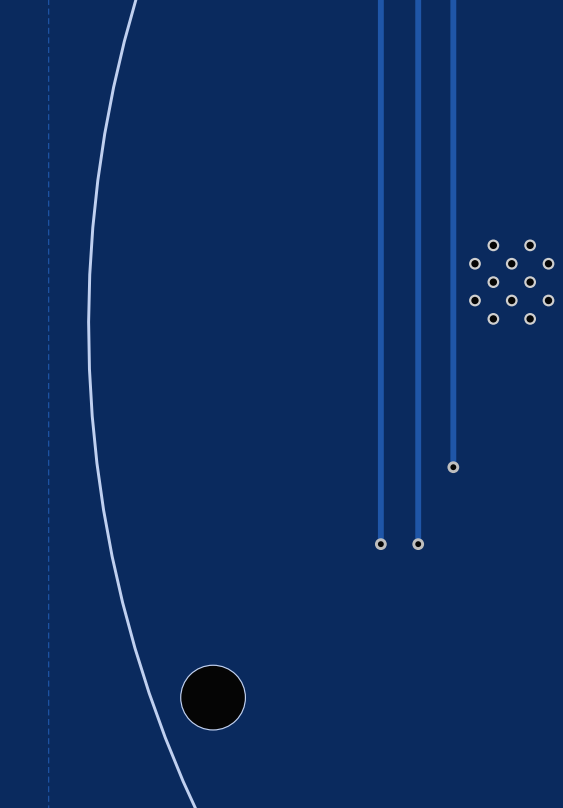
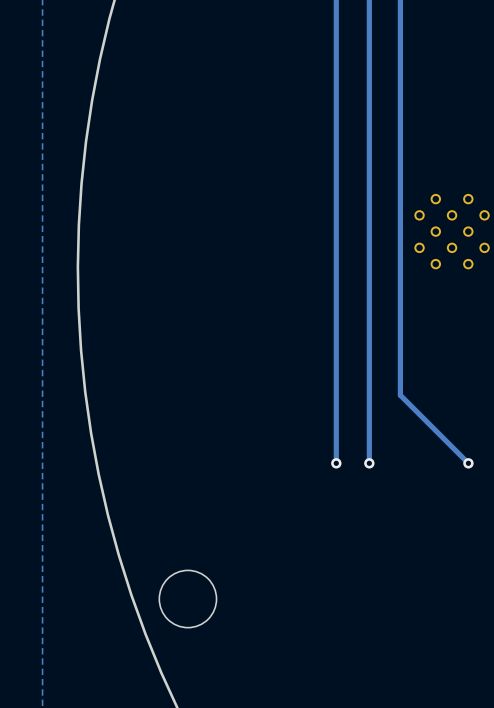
track: none -> (400, 395) (468, 463)
via position: (453, 467) -> (468, 463)

